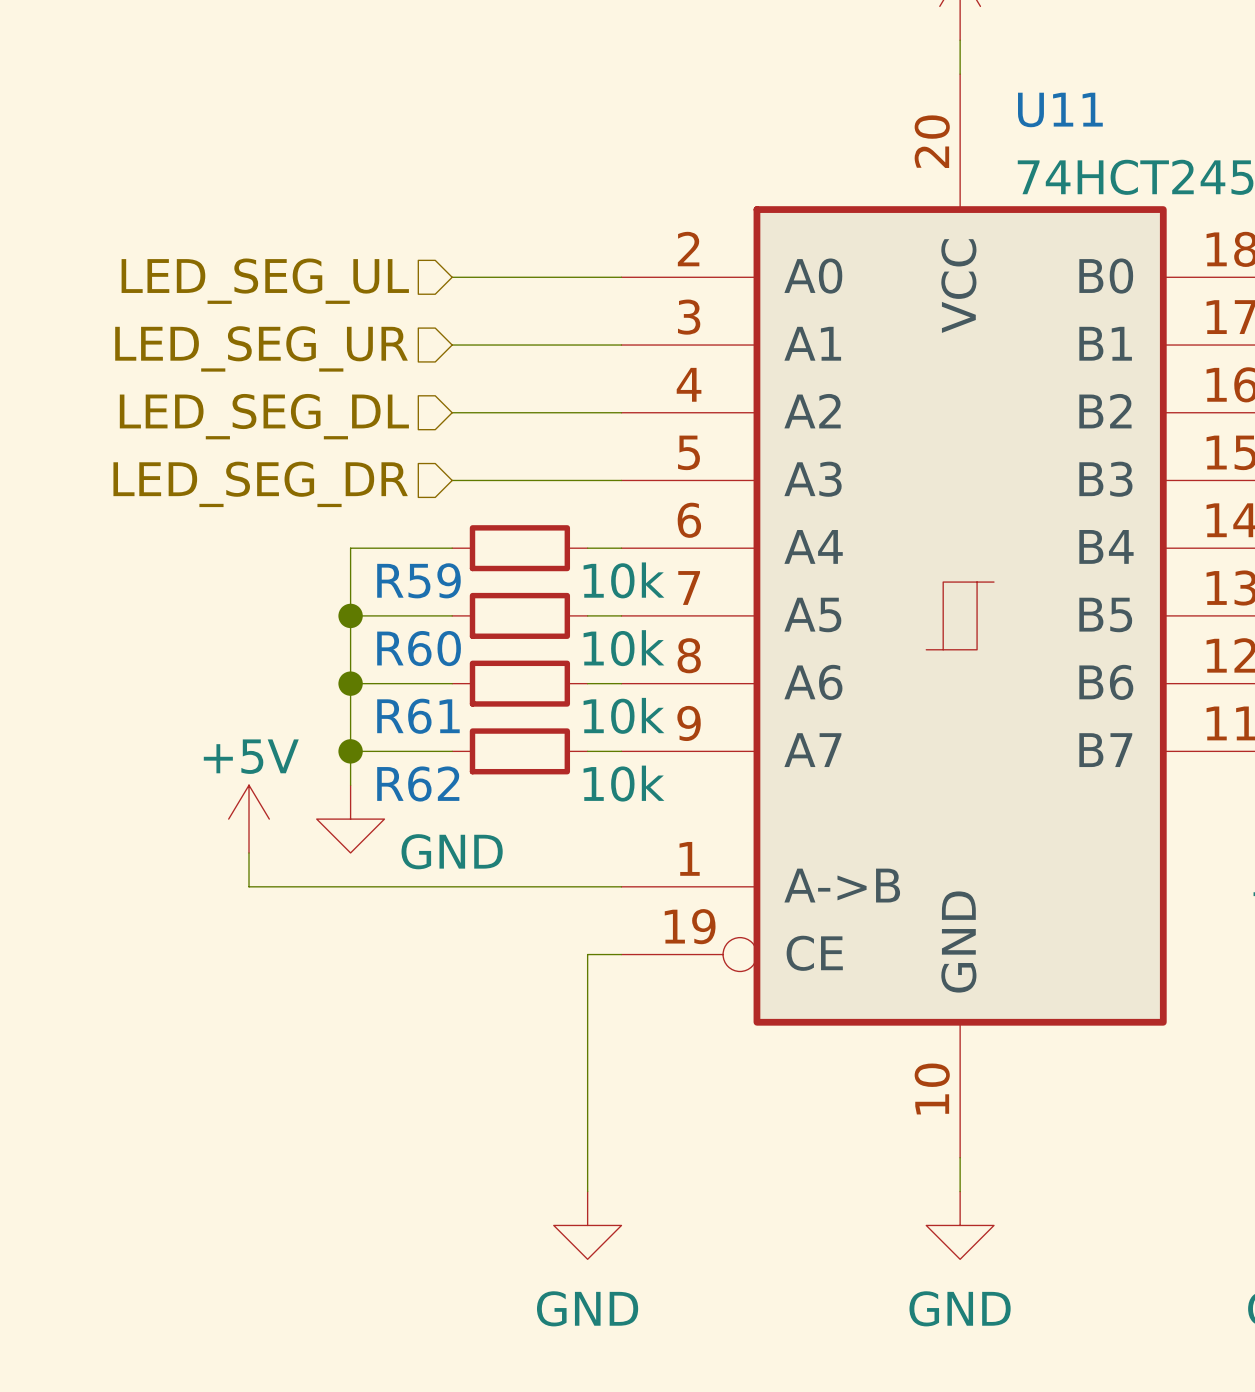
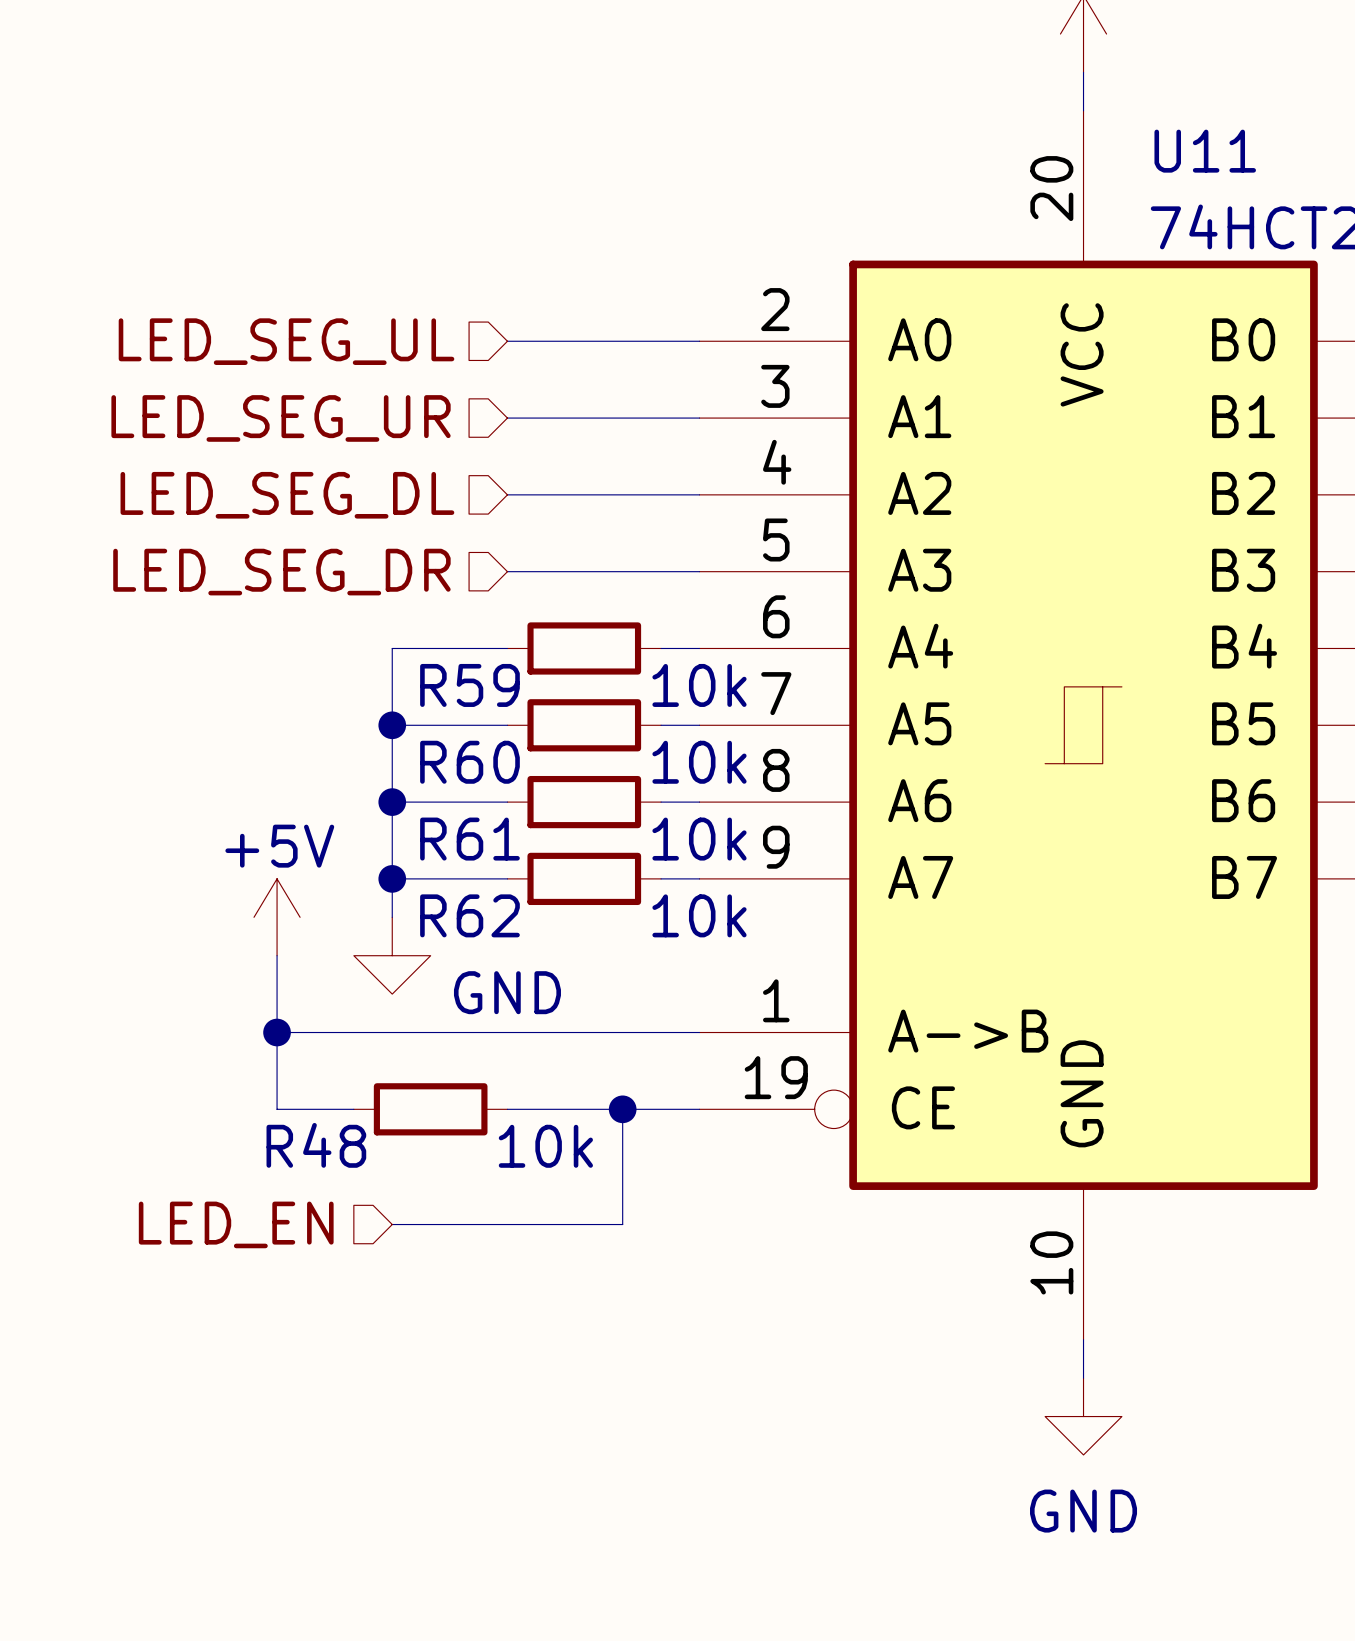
power symbol position: +5V (249, 819) -> +5V (277, 917)
wire: none -> (277, 1032) (277, 1109) (353, 1109)
junction: none -> (277, 1032)
R48: none -> 10k (430, 1109)
wire: none -> (622, 1109) (622, 1224) (392, 1224)
junction: none -> (622, 1109)
wire: (587, 954) (587, 1191) -> (661, 1109) (507, 1109)
hierarchical label: none -> LED_EN (236, 1224)
power symbol: GND (587, 1225) -> none

